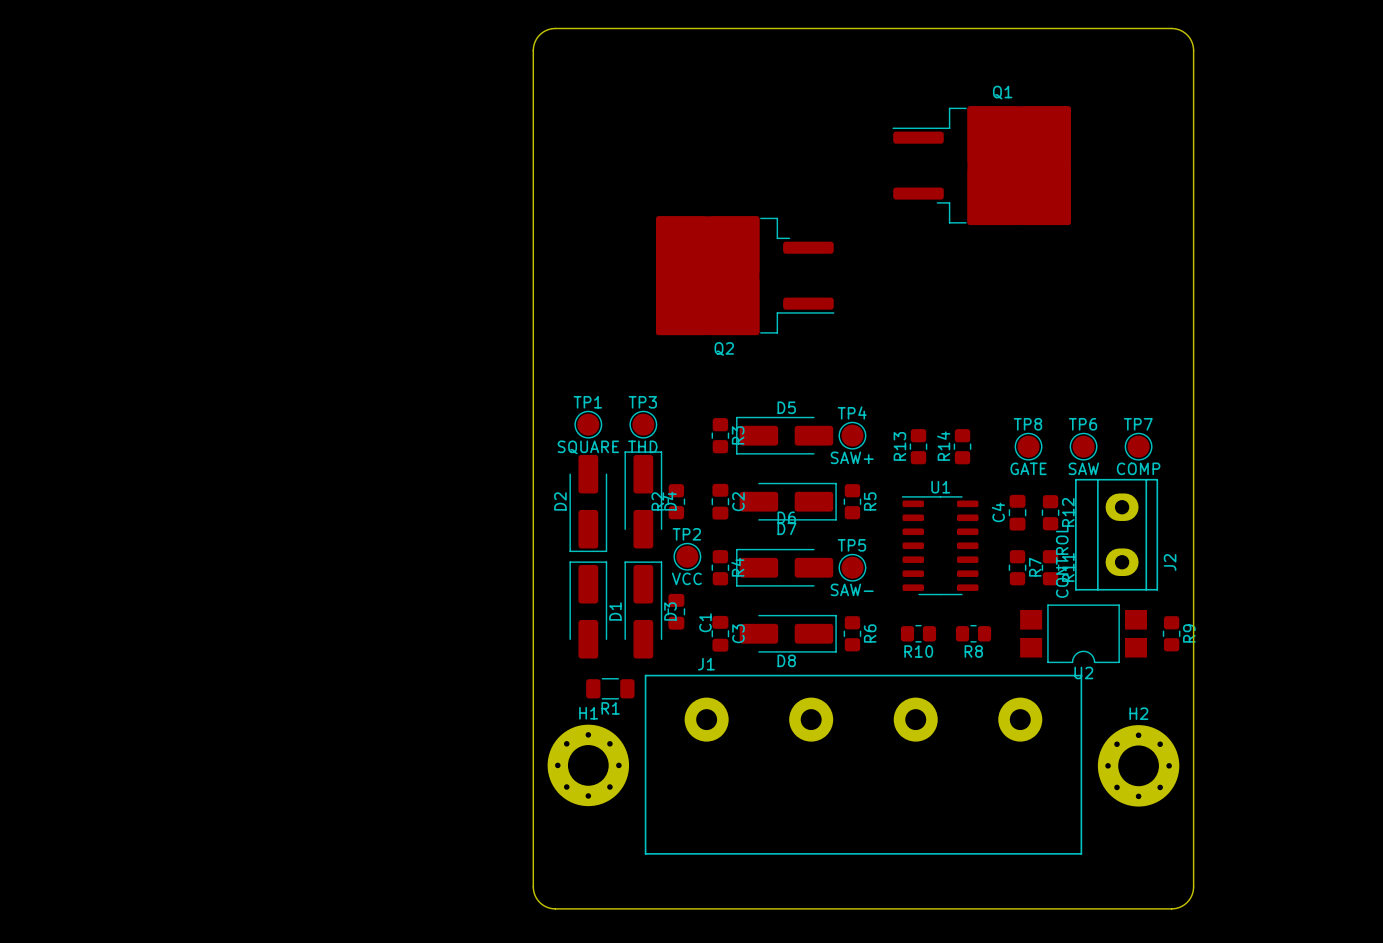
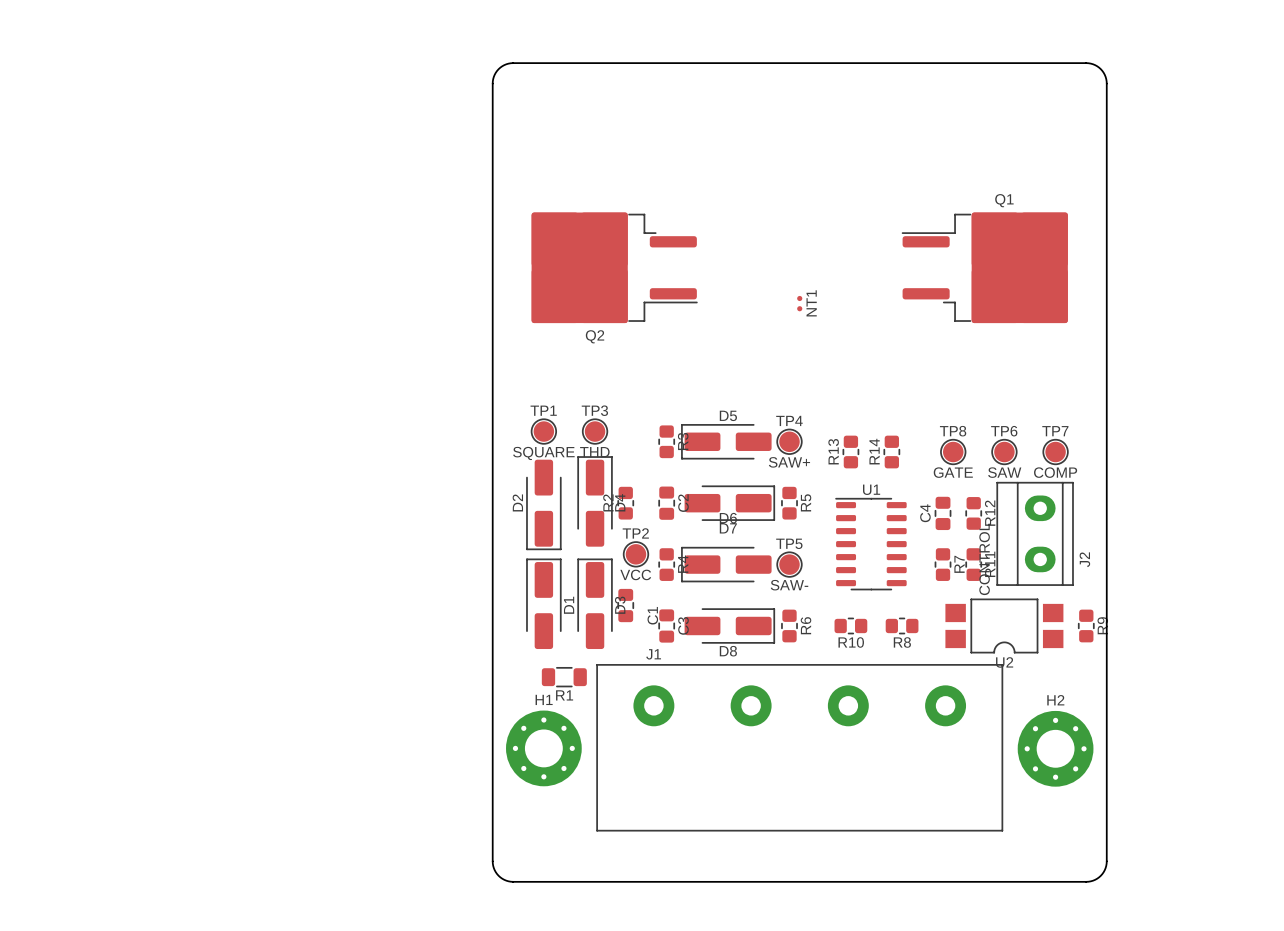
Q1 position: (981, 165) -> (984, 267)
Q2 position: (745, 275) -> (614, 267)
NT1: none -> (799, 303)

